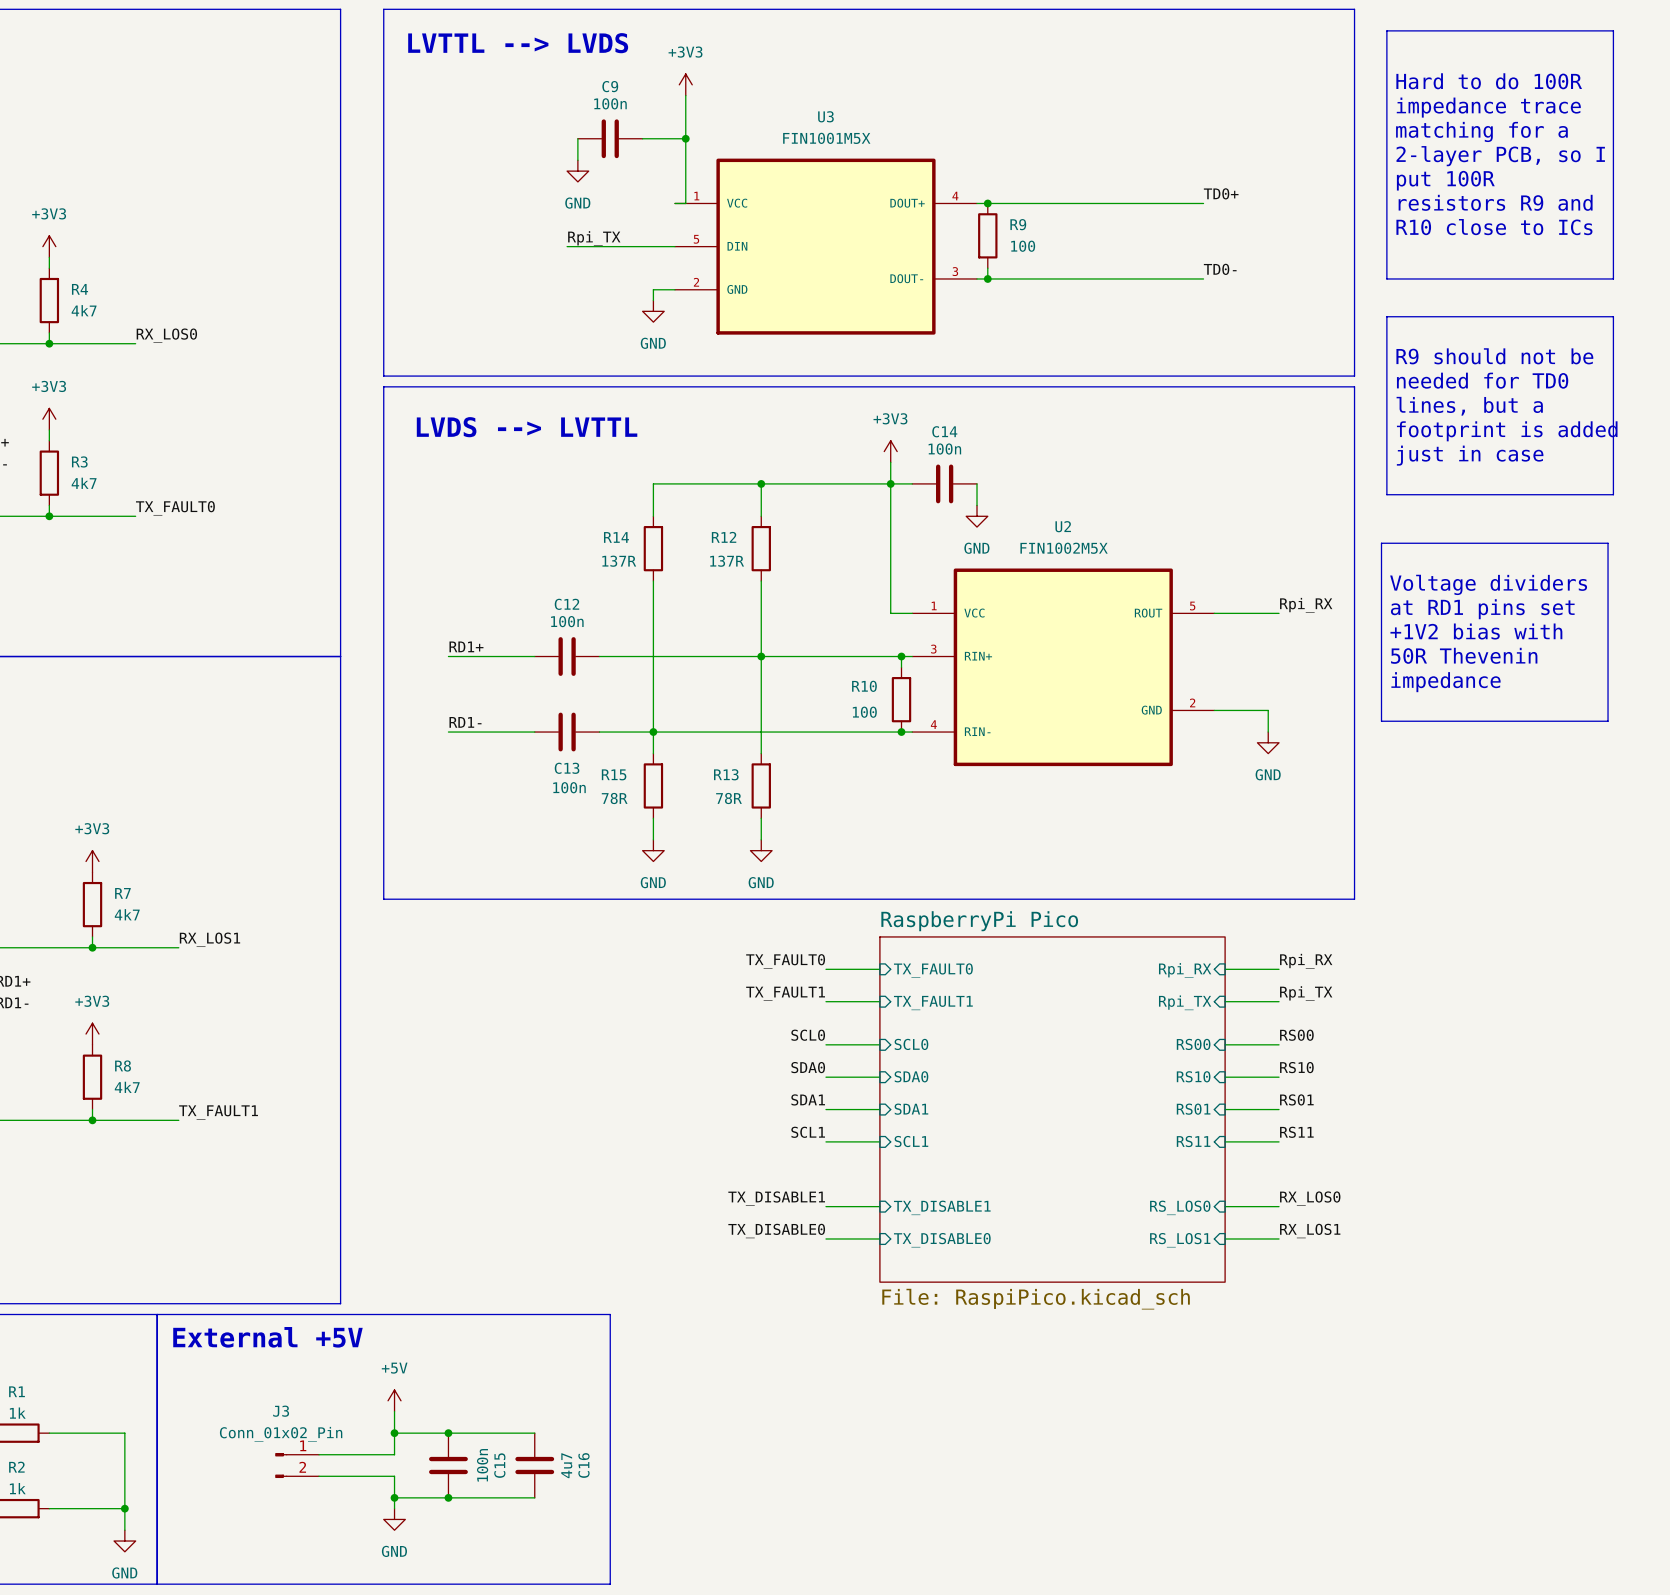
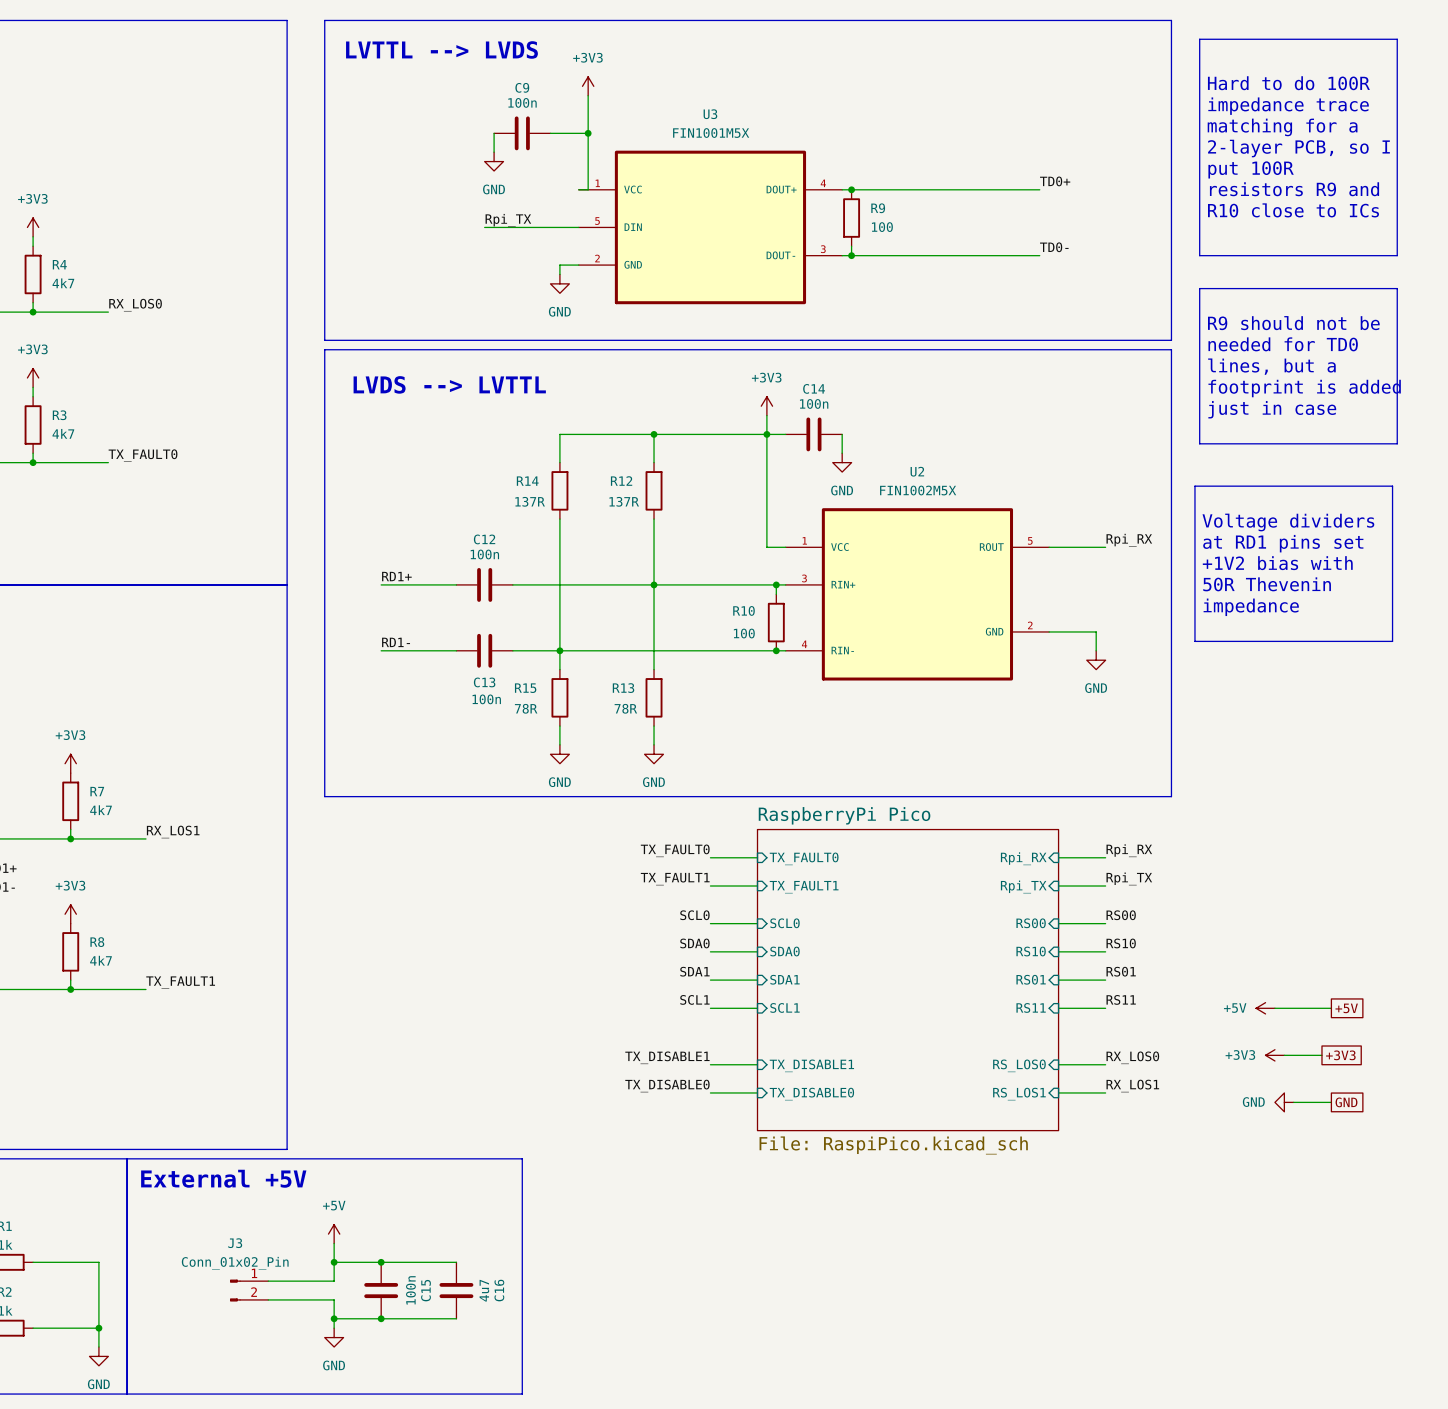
power symbol: none -> +5V (1265, 1008)
wire: none -> (1274, 1008) (1331, 1008)
global label: none -> +5V (1346, 1008)
power symbol: none -> +3V3 (1274, 1055)
wire: none -> (1284, 1055) (1321, 1055)
global label: none -> +3V3 (1340, 1055)
power symbol: none -> GND (1284, 1102)
wire: none -> (1293, 1102) (1331, 1102)
global label: none -> GND (1346, 1102)

